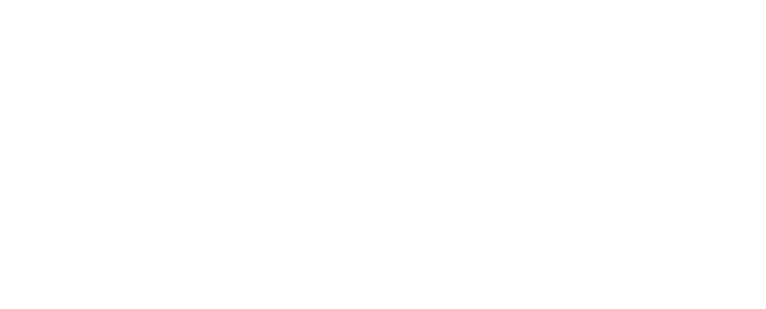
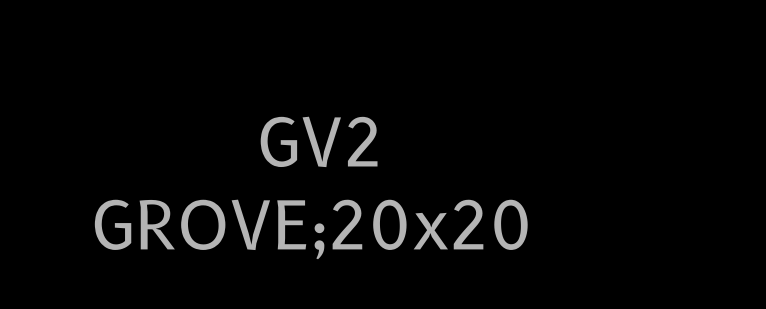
GV2: none -> GROVE;20x20 (311, 188)

